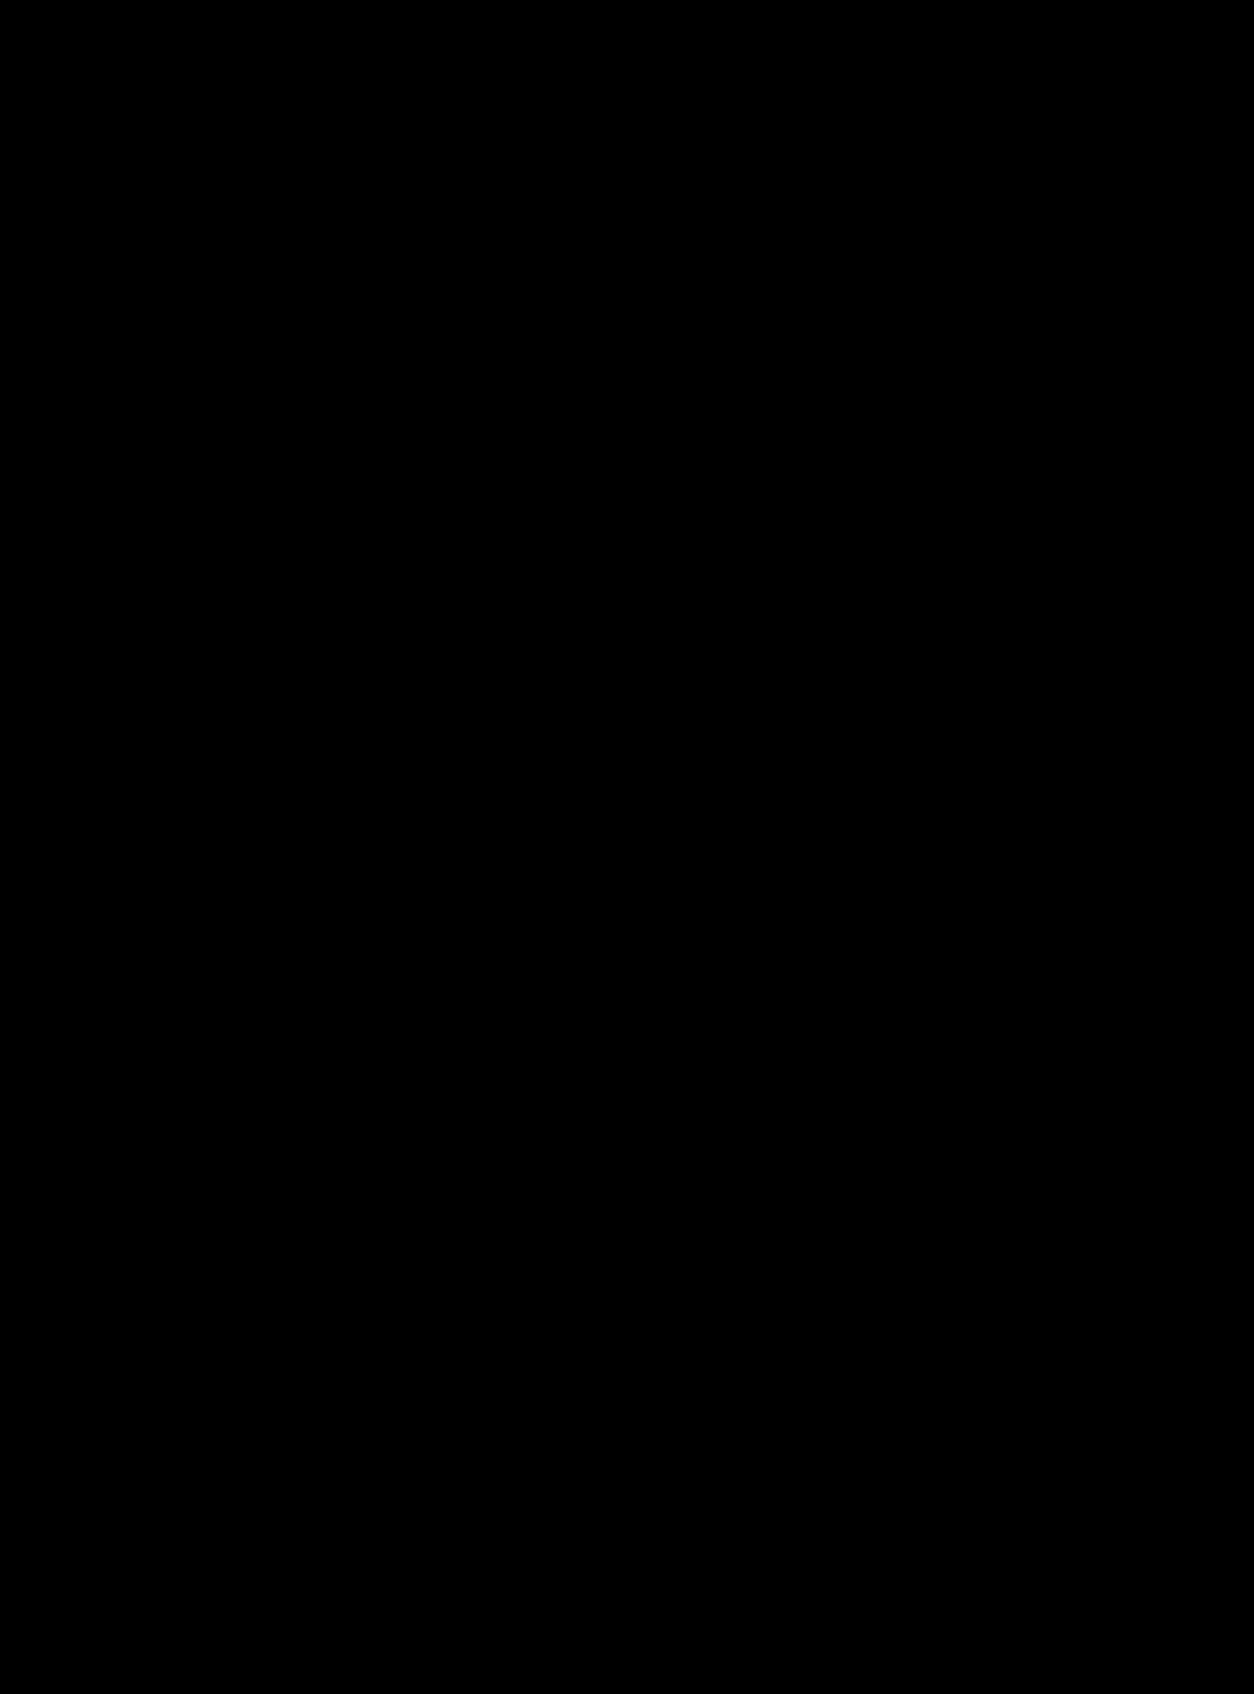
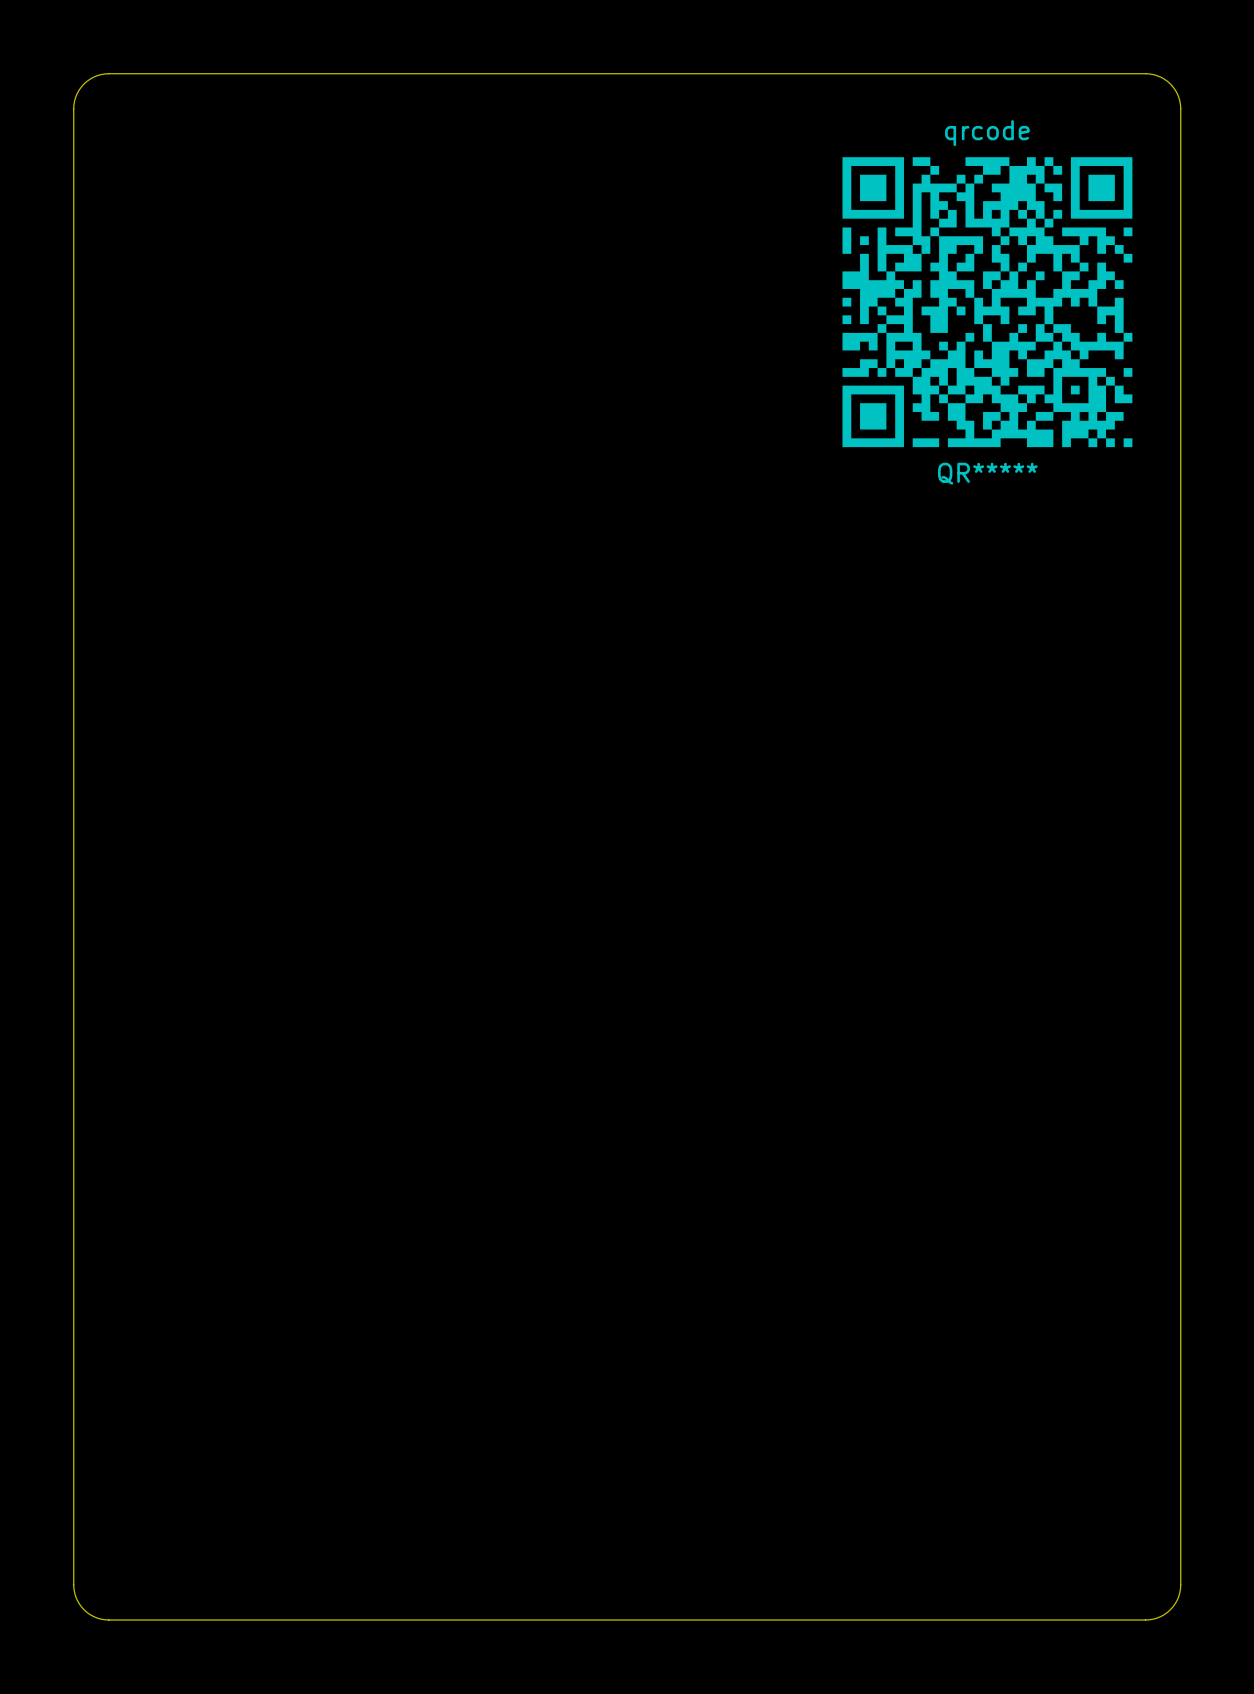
board edge: none -> (108, 73) (1145, 73) (1164, 79) (1175, 90) (1180, 108) (1180, 1584) (1175, 1603) (1164, 1614) (1145, 1620) (108, 1620) (90, 1614) (79, 1603) (73, 1584) (73, 108) (75, 97) (84, 84) (97, 75) (108, 73)
QR*****: none -> qrcode (987, 302)

